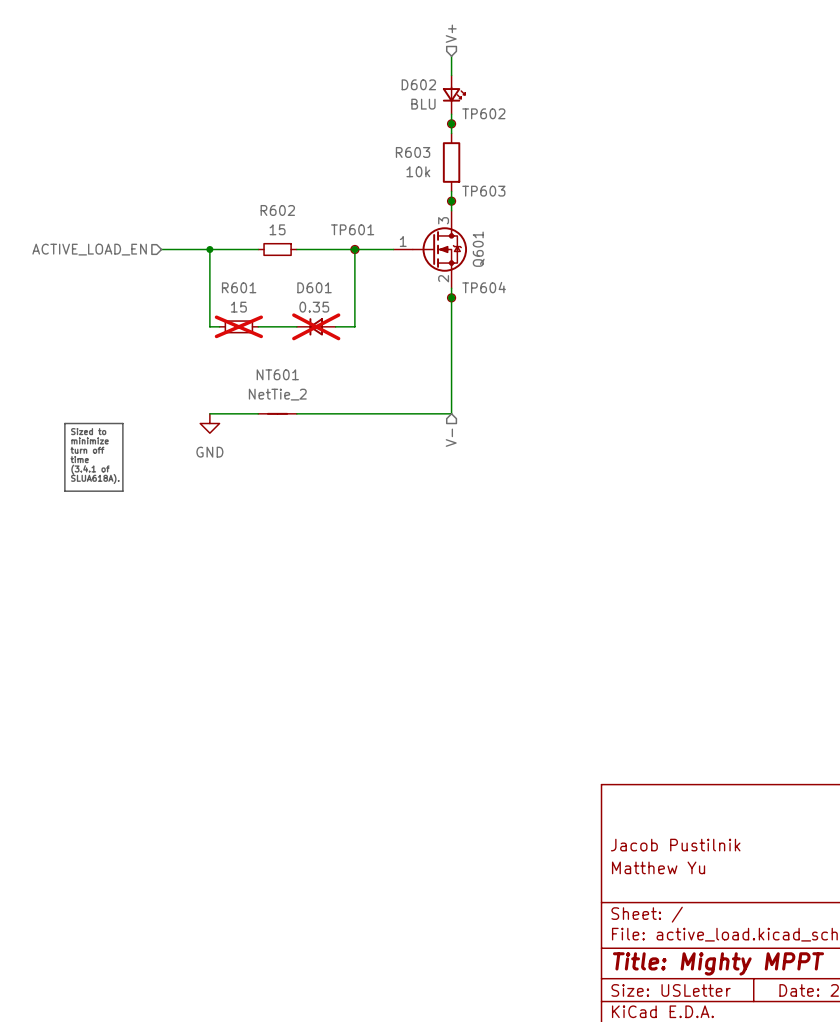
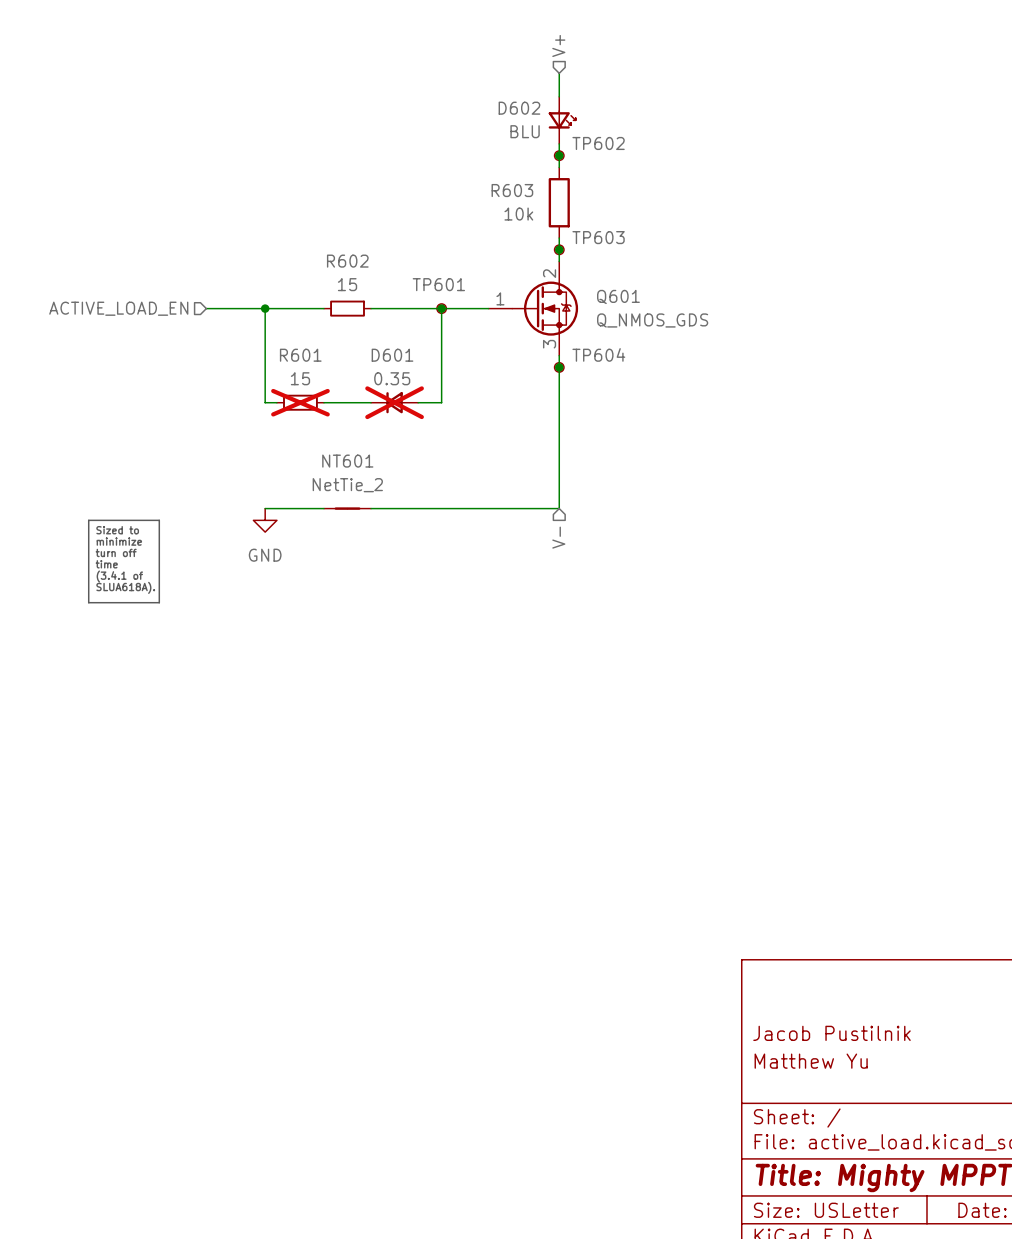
Q601 pin number: 3 (443, 220) -> 2 (549, 273)
Q601 name rotation: 0° (478, 249) -> 90° clockwise (618, 296)
Q601 value: none -> Q_NMOS_GDS (652, 320)
Q601 pin number: 2 (443, 278) -> 3 (549, 344)

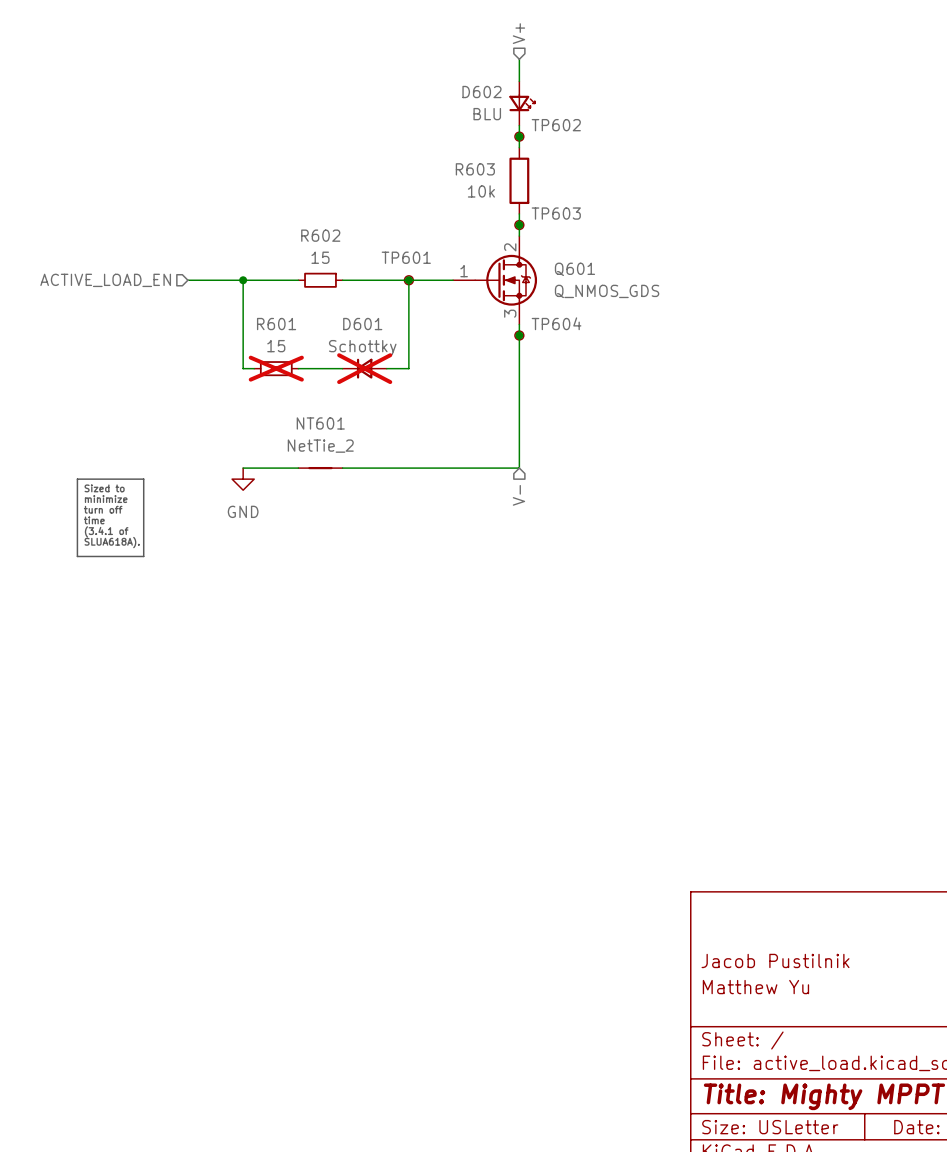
D601 value: 0.35 (392, 378) -> Schottky (362, 347)

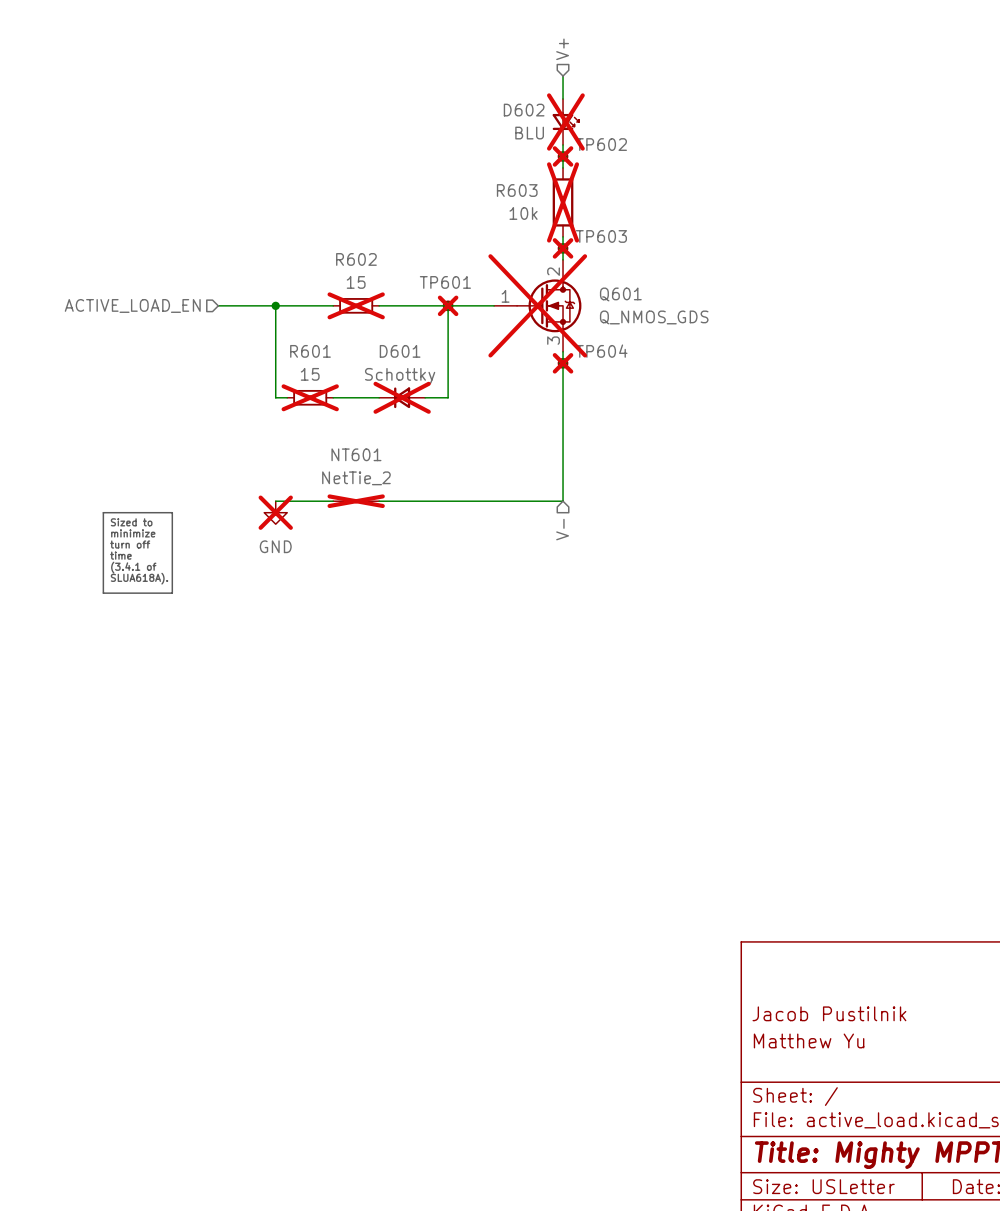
D602 do-not-place cross: none -> (565, 121)
TP602 do-not-place cross: none -> (563, 156)
R603 do-not-place cross: none -> (563, 202)
TP603 do-not-place cross: none -> (563, 248)
R602 do-not-place cross: none -> (356, 305)
TP601 do-not-place cross: none -> (448, 305)
Q601 do-not-place cross: none -> (537, 305)
TP604 do-not-place cross: none -> (563, 363)
NT601 do-not-place cross: none -> (356, 501)
power symbol do-not-place cross: none -> (275, 512)

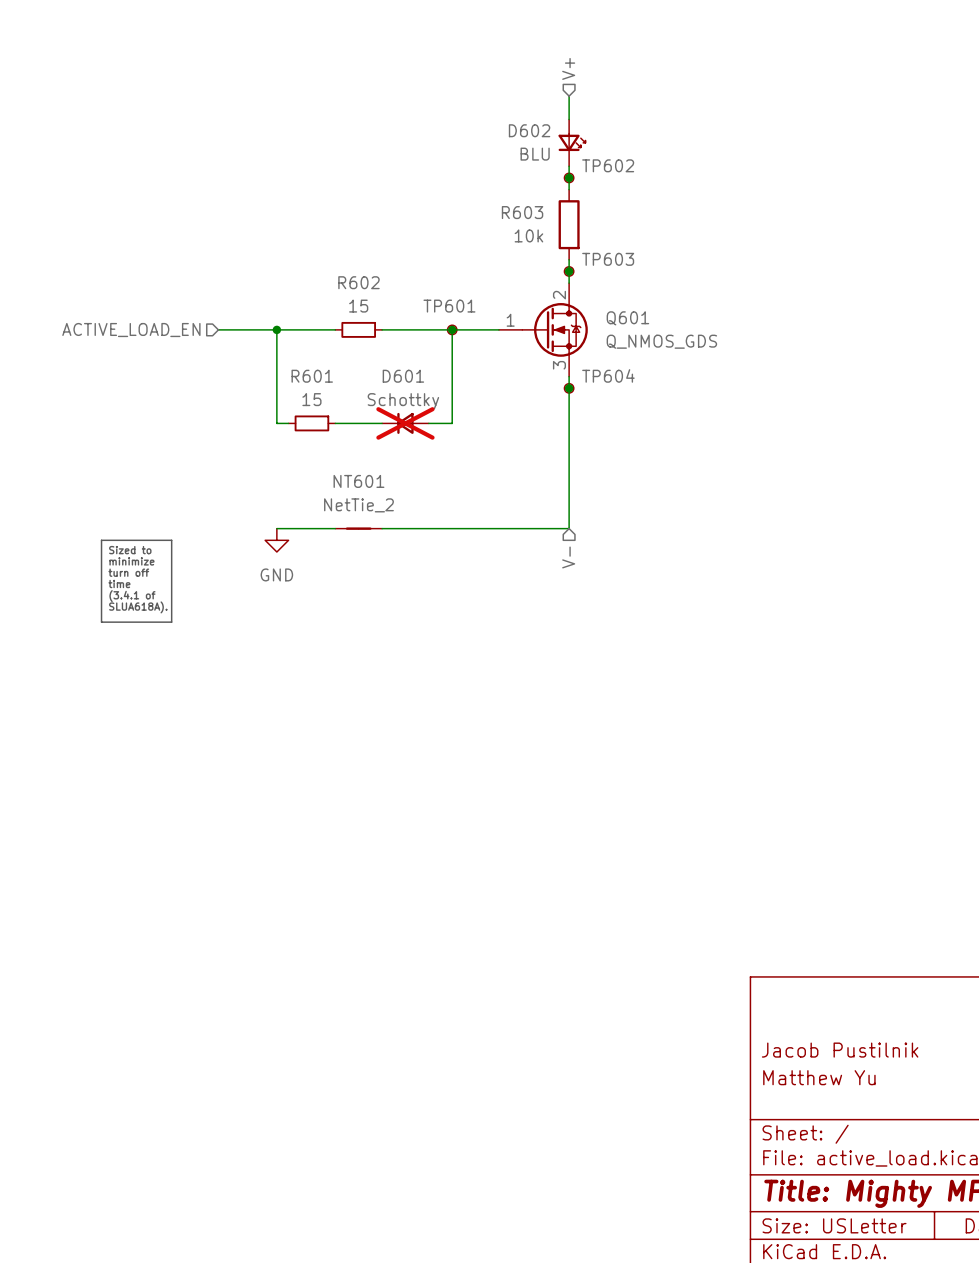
D602 do-not-place cross: (565, 121) -> none
TP602 do-not-place cross: (563, 156) -> none
R603 do-not-place cross: (563, 202) -> none
TP603 do-not-place cross: (563, 248) -> none
R602 do-not-place cross: (356, 305) -> none
TP601 do-not-place cross: (448, 305) -> none
Q601 do-not-place cross: (537, 305) -> none
TP604 do-not-place cross: (563, 363) -> none
R601 do-not-place cross: (310, 397) -> none
NT601 do-not-place cross: (356, 501) -> none
power symbol do-not-place cross: (275, 512) -> none

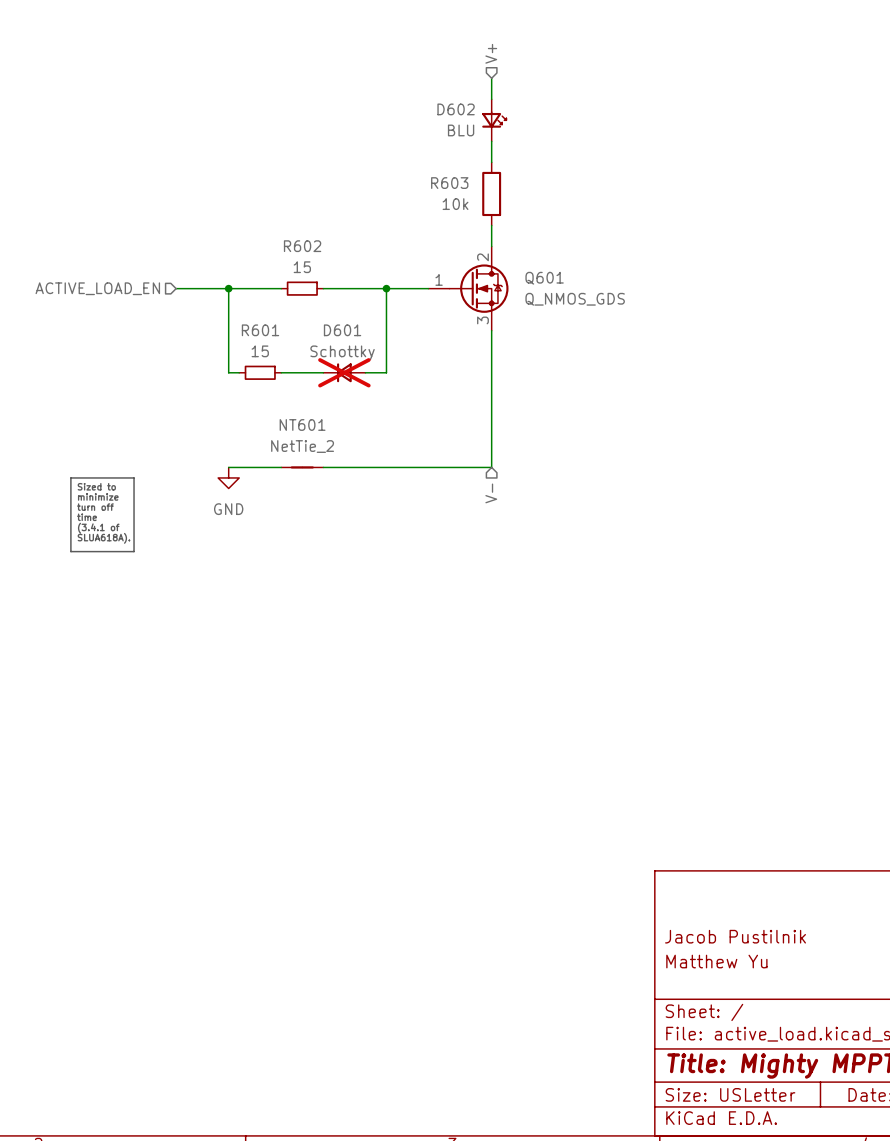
junction: (569, 177) -> none
TP602: (569, 177) -> none
junction: (569, 271) -> none
TP603: (569, 271) -> none
TP601: (452, 329) -> none
junction: (569, 388) -> none
TP604: (569, 388) -> none

